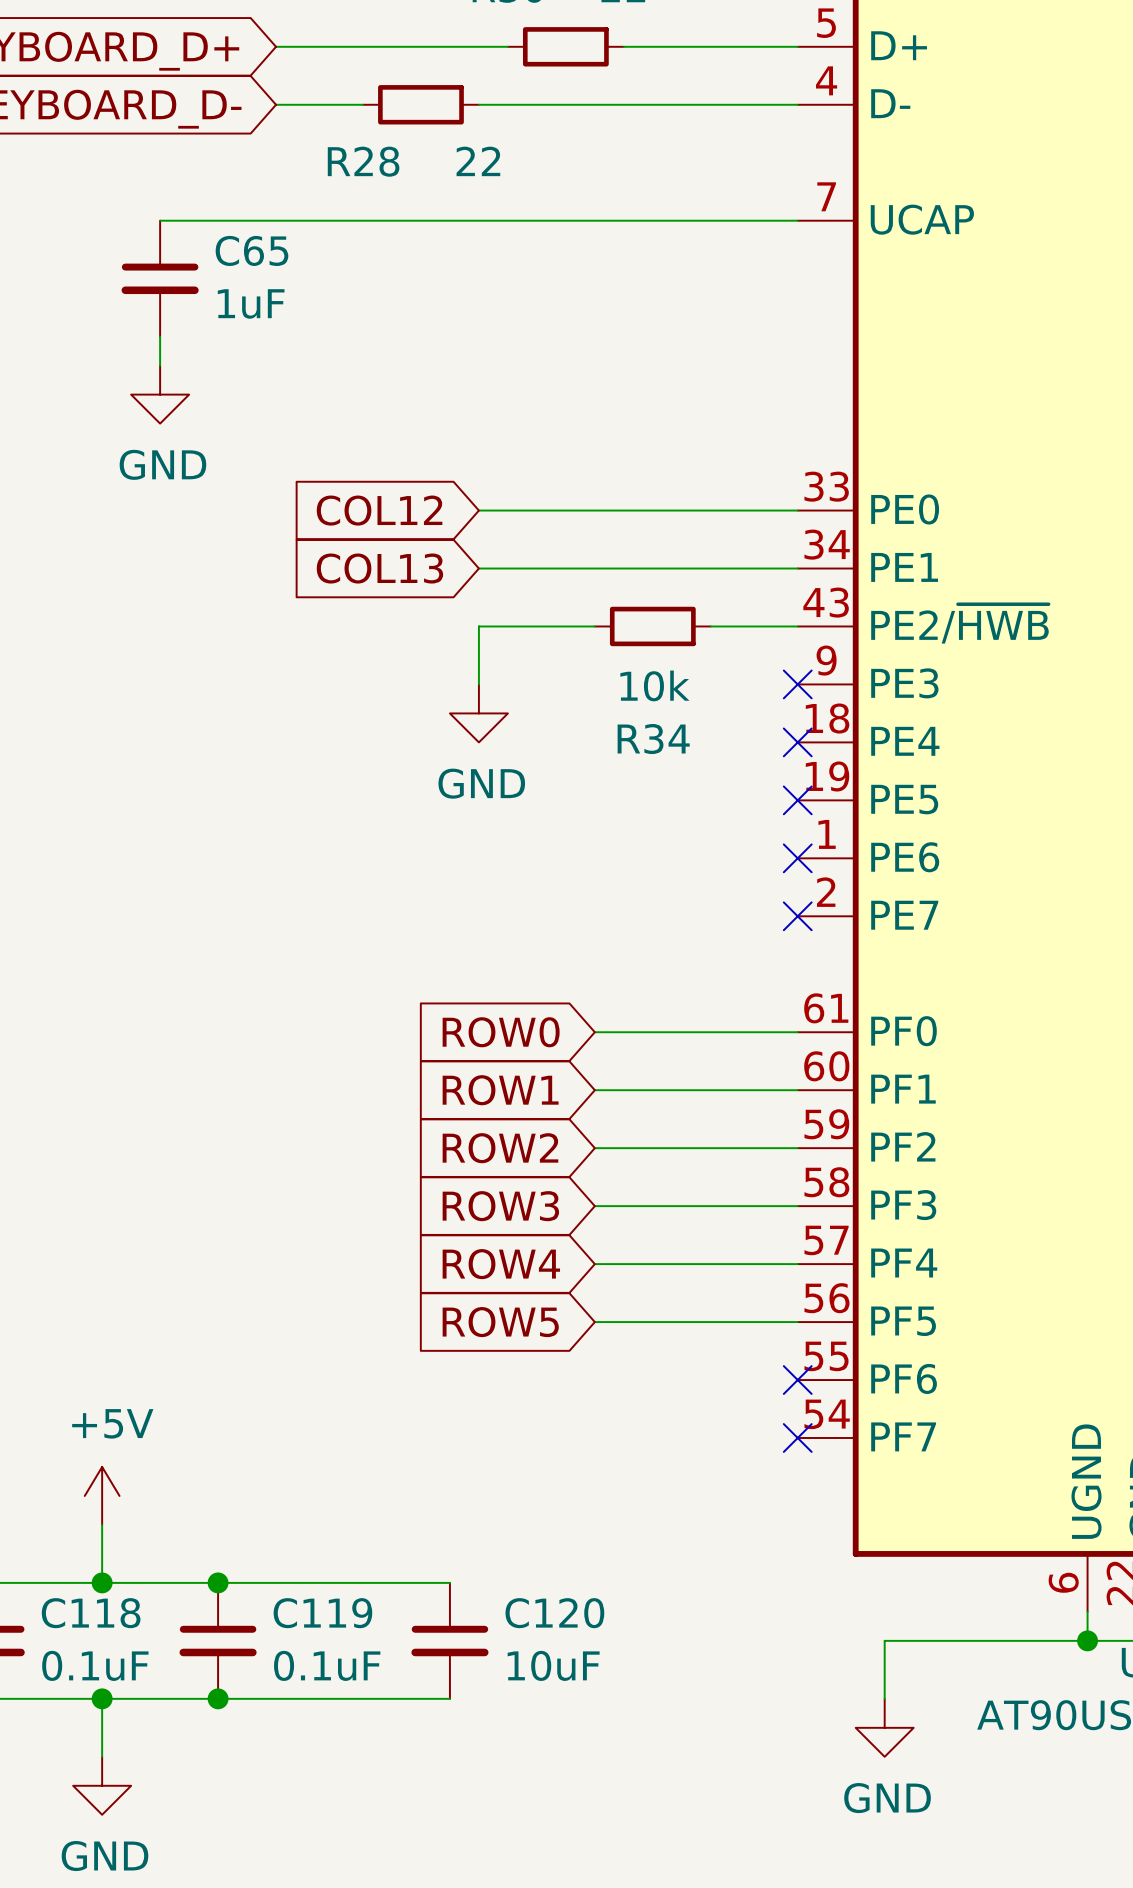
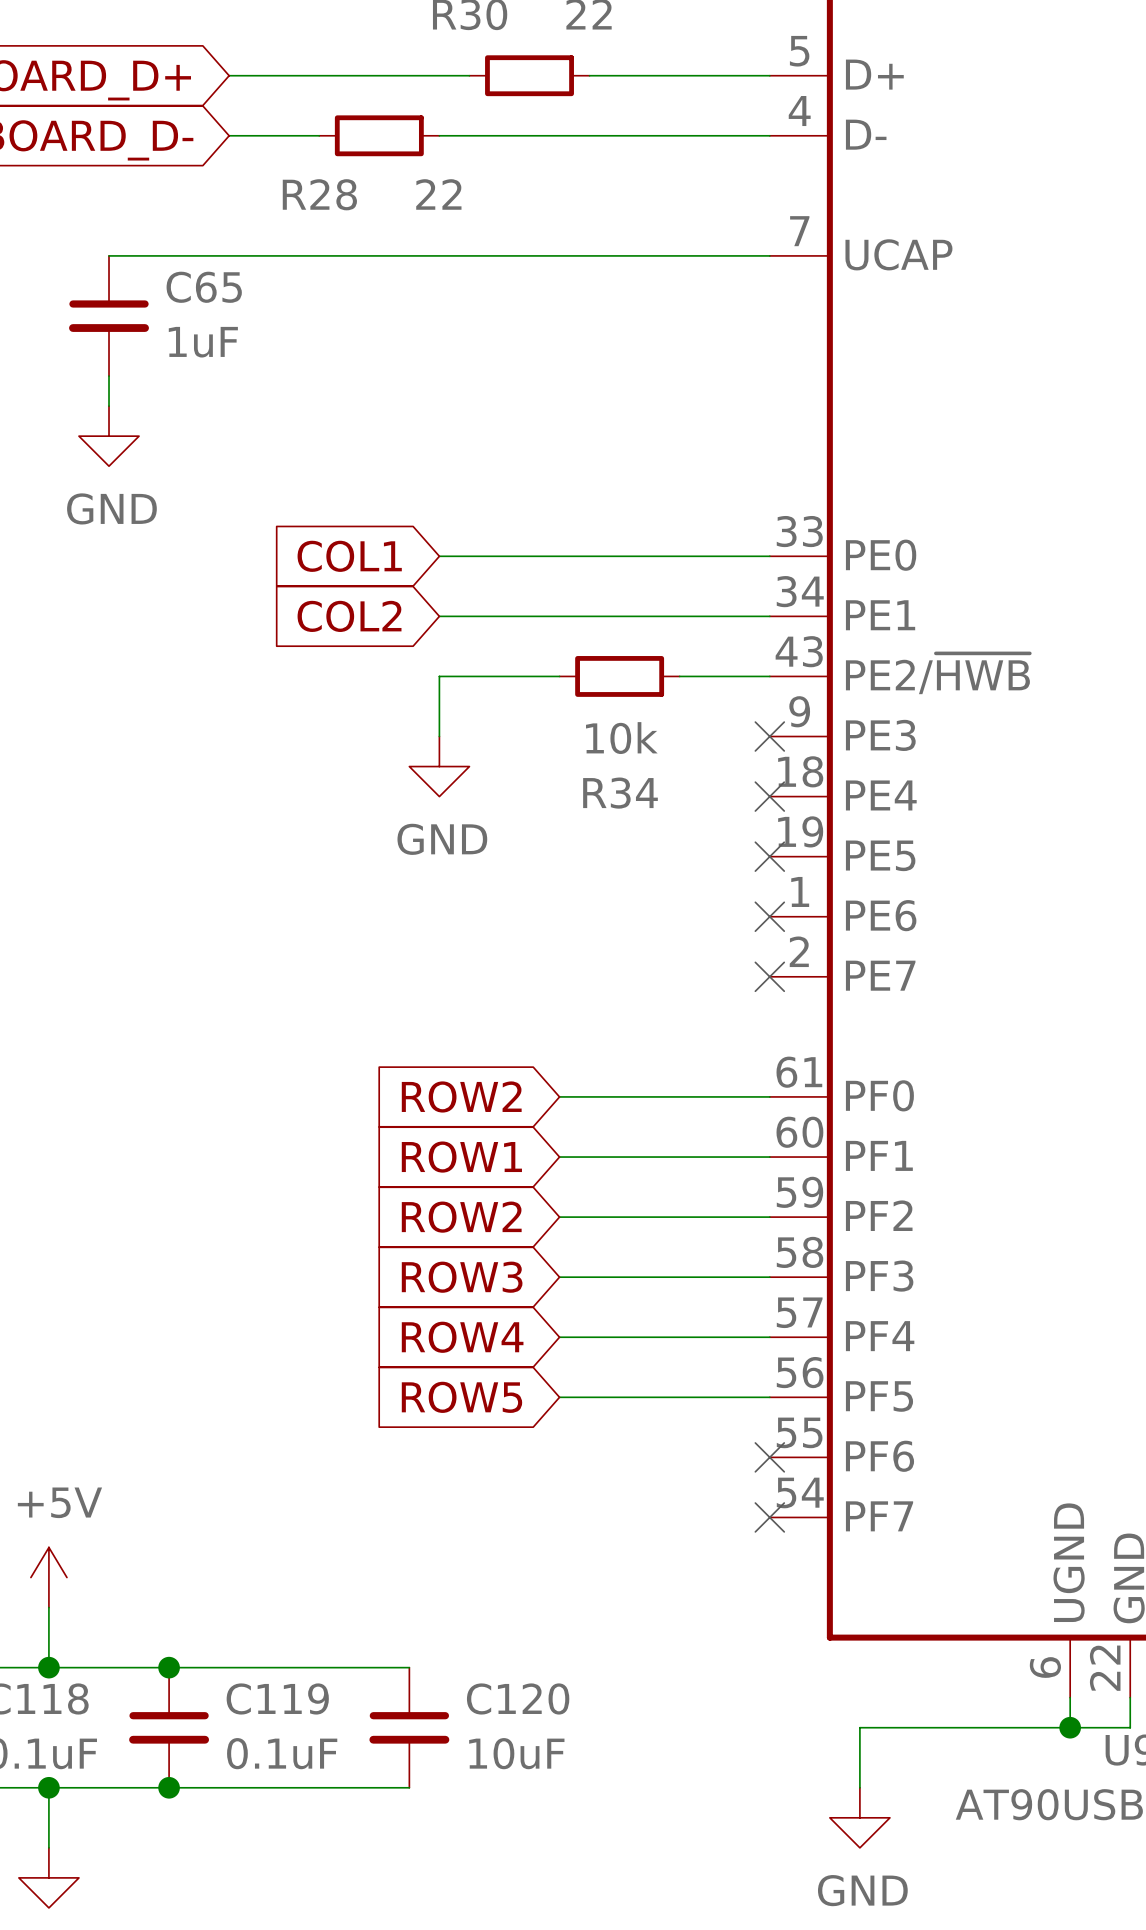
global label: COL12 (379, 510) -> COL1 (349, 556)
global label: COL13 (379, 568) -> COL2 (349, 616)
global label: ROW0 (501, 1032) -> ROW2 (461, 1096)

